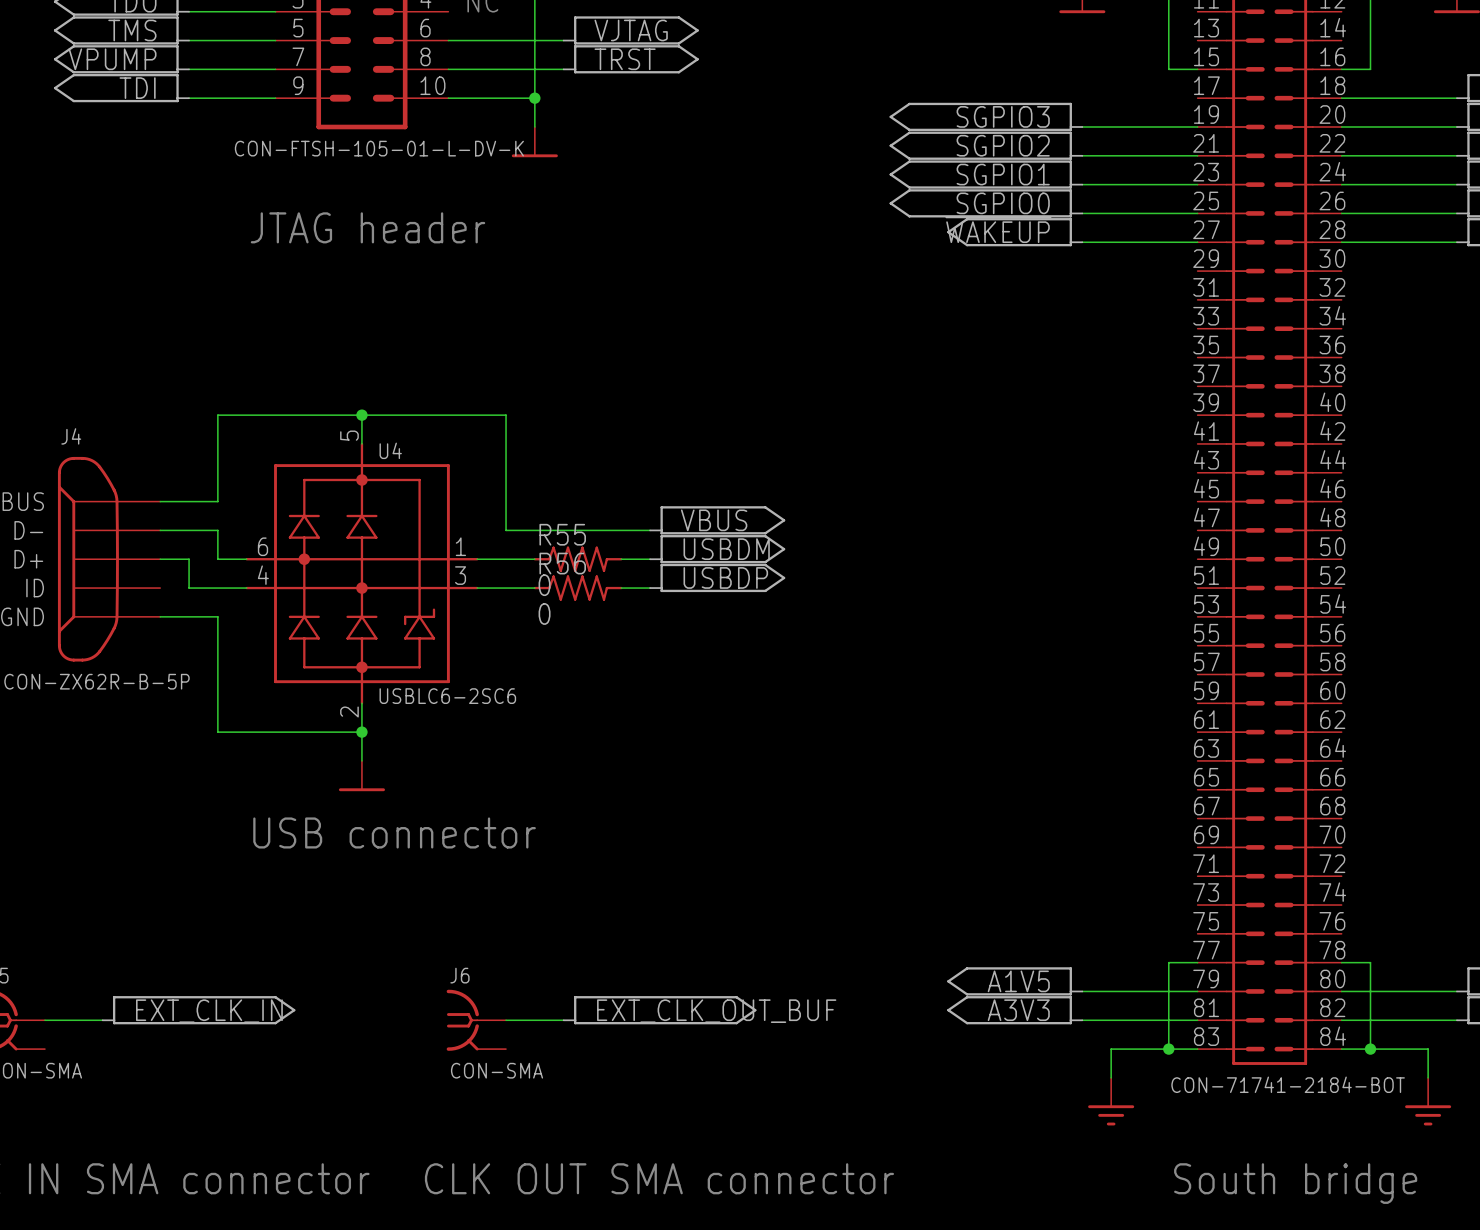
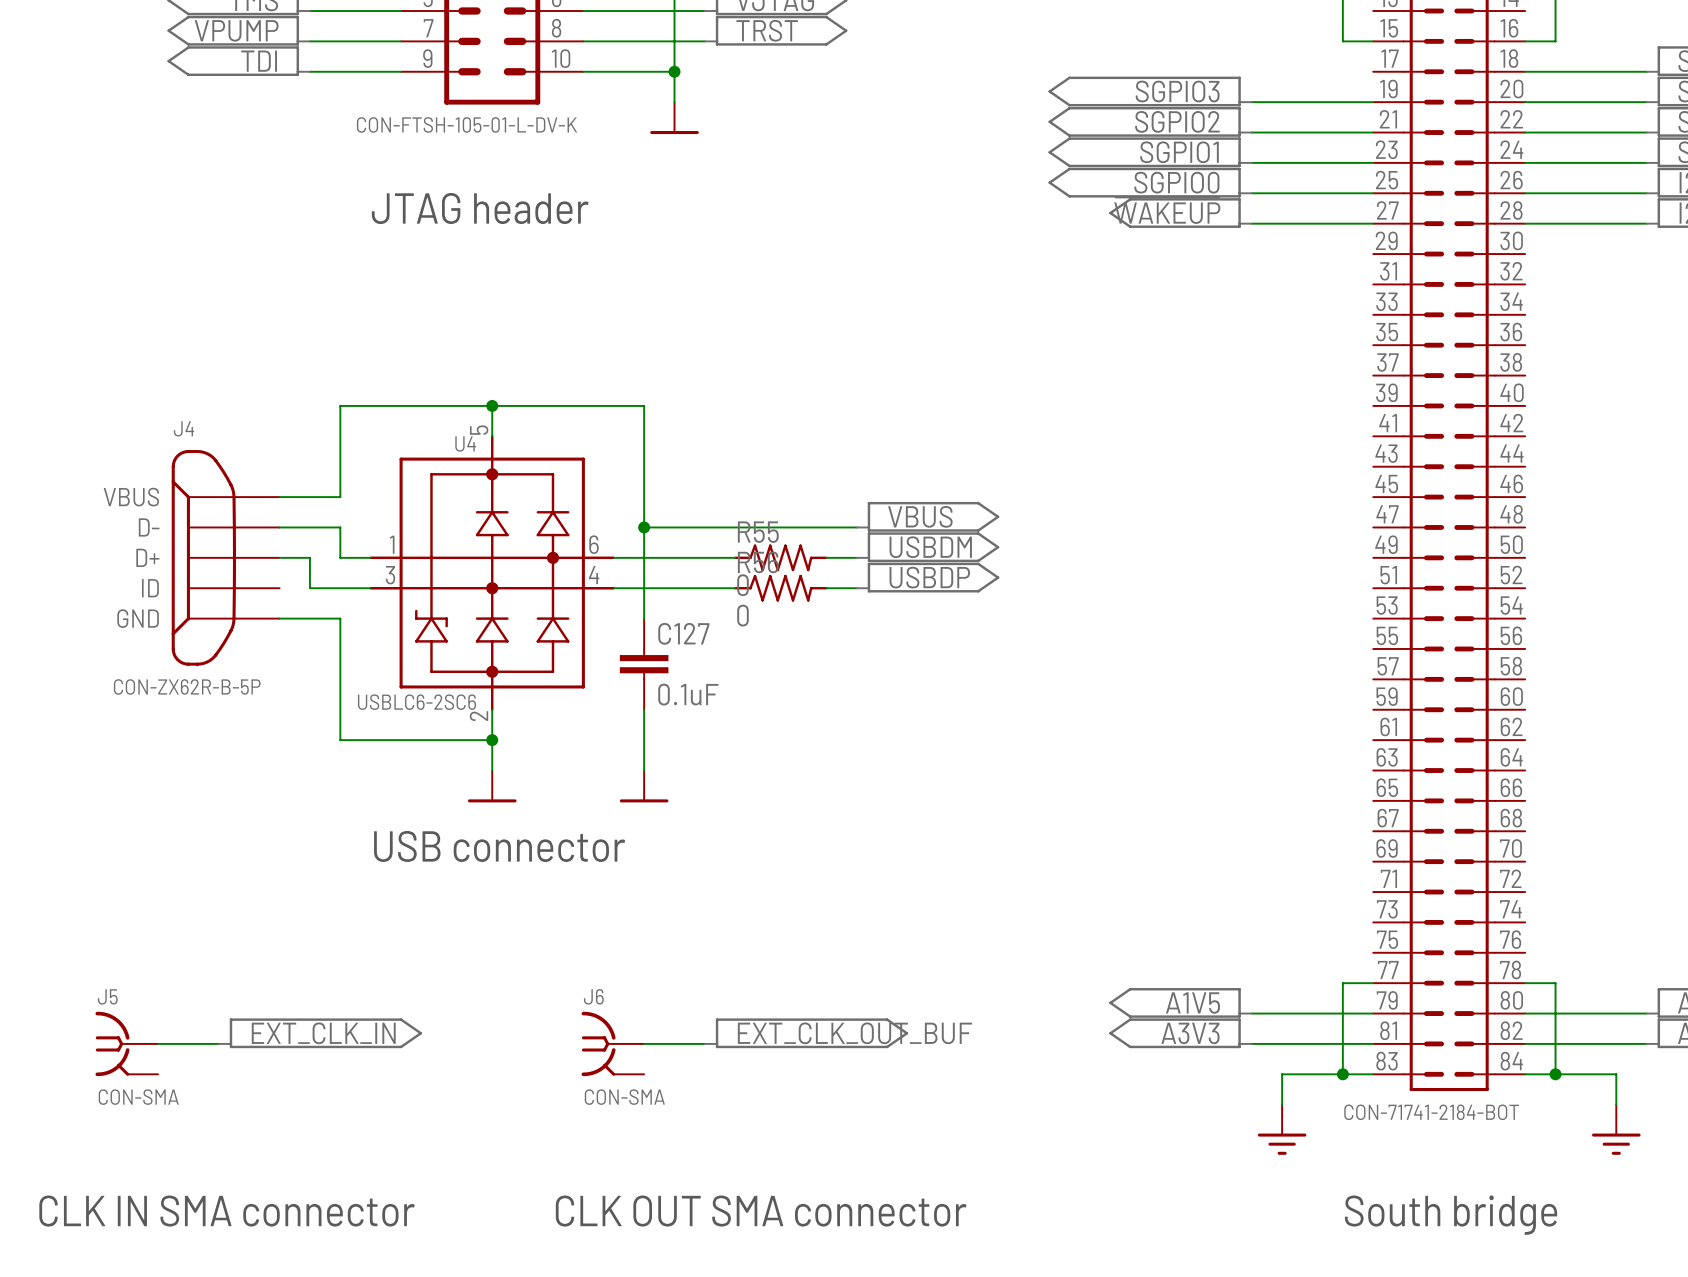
label position: VBUS (714, 520) -> VBUS (920, 516)
part: (717, 520) -> none
part: none -> (927, 516)
wire: none -> (644, 527) (644, 618)
junction: none -> (644, 527)
wire: none -> (796, 527) (856, 527)
part: (717, 549) -> none
label position: USBDM (726, 549) -> USBDM (930, 547)
part: none -> (927, 547)
R55 position: (578, 559) -> (780, 557)
wire: (621, 559) (650, 559) -> (826, 557) (856, 557)
U4 flip: as is (361, 573) -> left-right (492, 573)
part: (717, 577) -> none
label position: USBDP (725, 577) -> USBDP (929, 577)
part: none -> (927, 577)
R56 position: (578, 588) -> (780, 588)
wire: (621, 588) (650, 588) -> (826, 588) (856, 588)
C127: none -> 0.1uF (644, 664)
wire: none -> (644, 709) (644, 770)
power symbol: none -> (644, 786)

